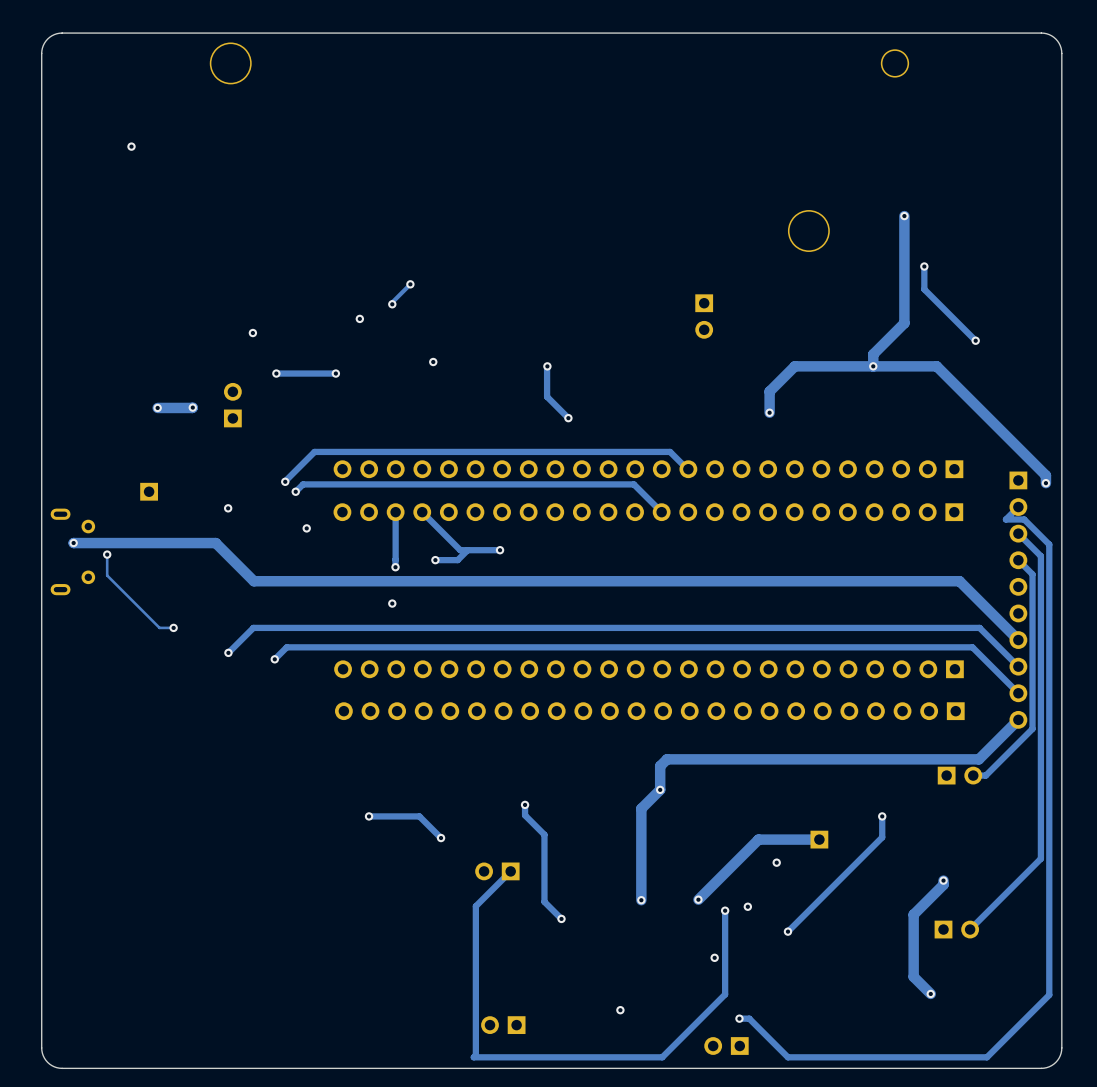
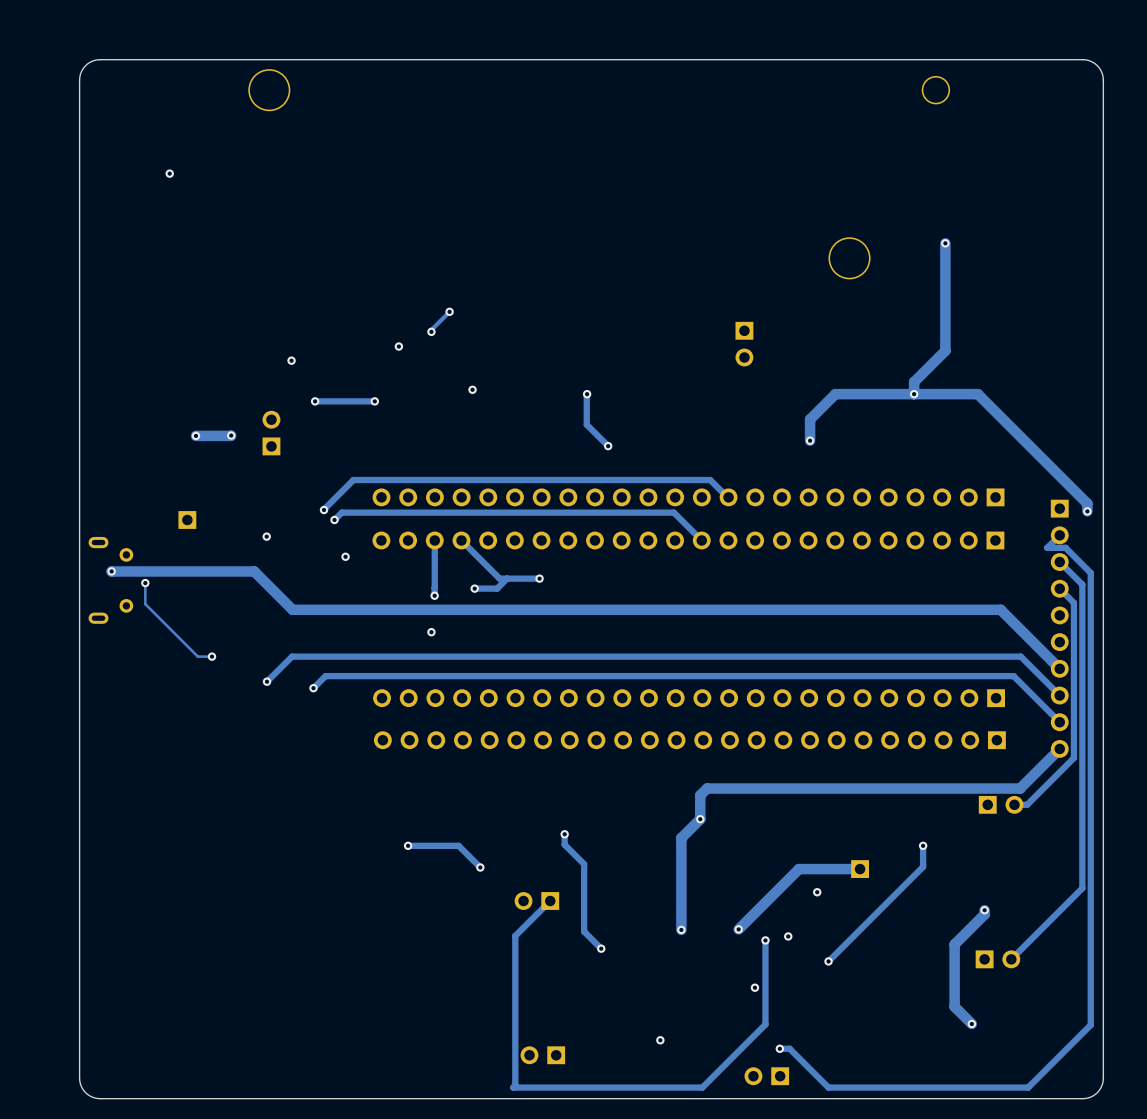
track: (924, 266) (924, 289) (975, 340) -> none
via: (924, 266) -> none
via: (975, 340) -> none

